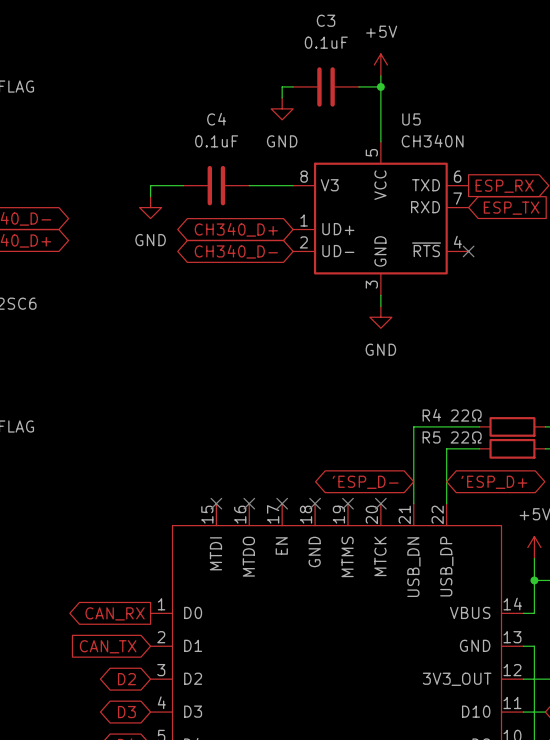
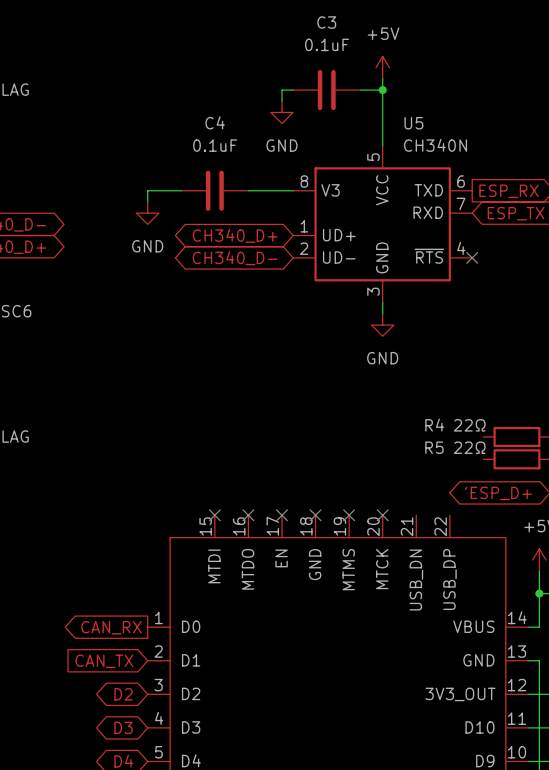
wire: (479, 426) (413, 426) (413, 503) -> none
wire: (479, 448) (446, 448) (446, 503) -> none
global label: 'ESP_D- (365, 482) -> none

